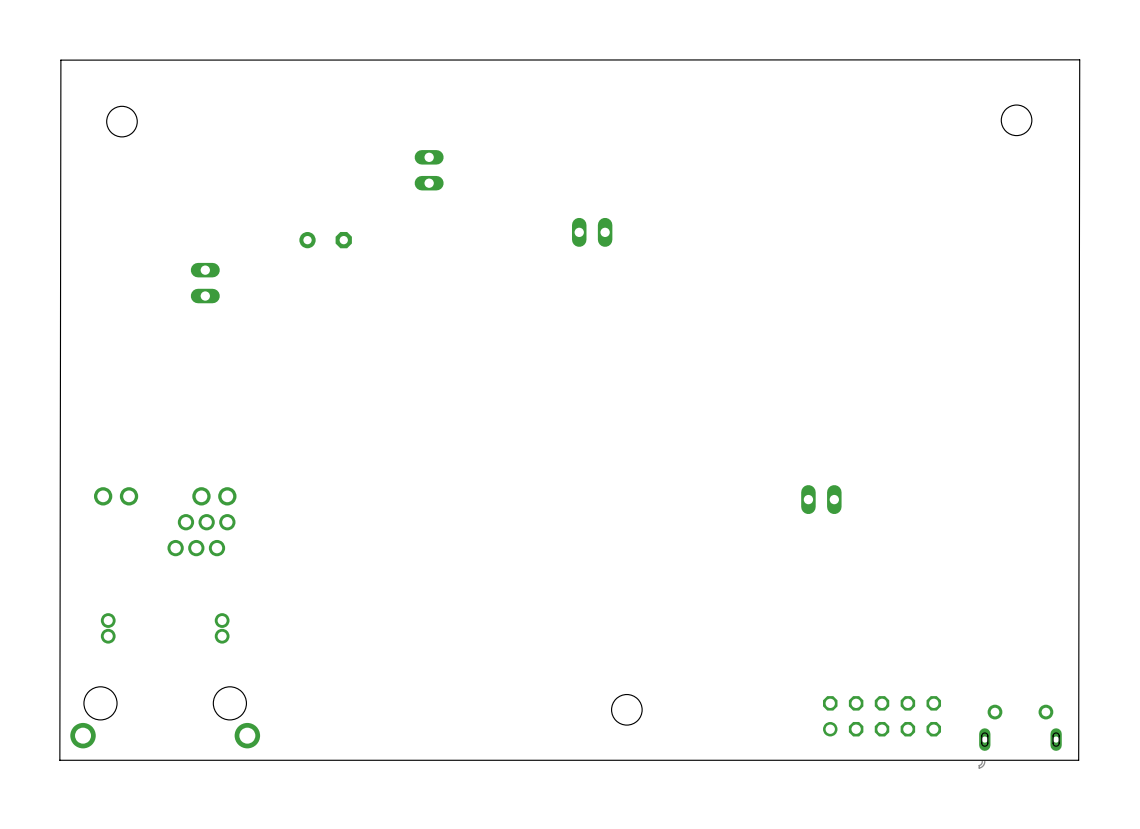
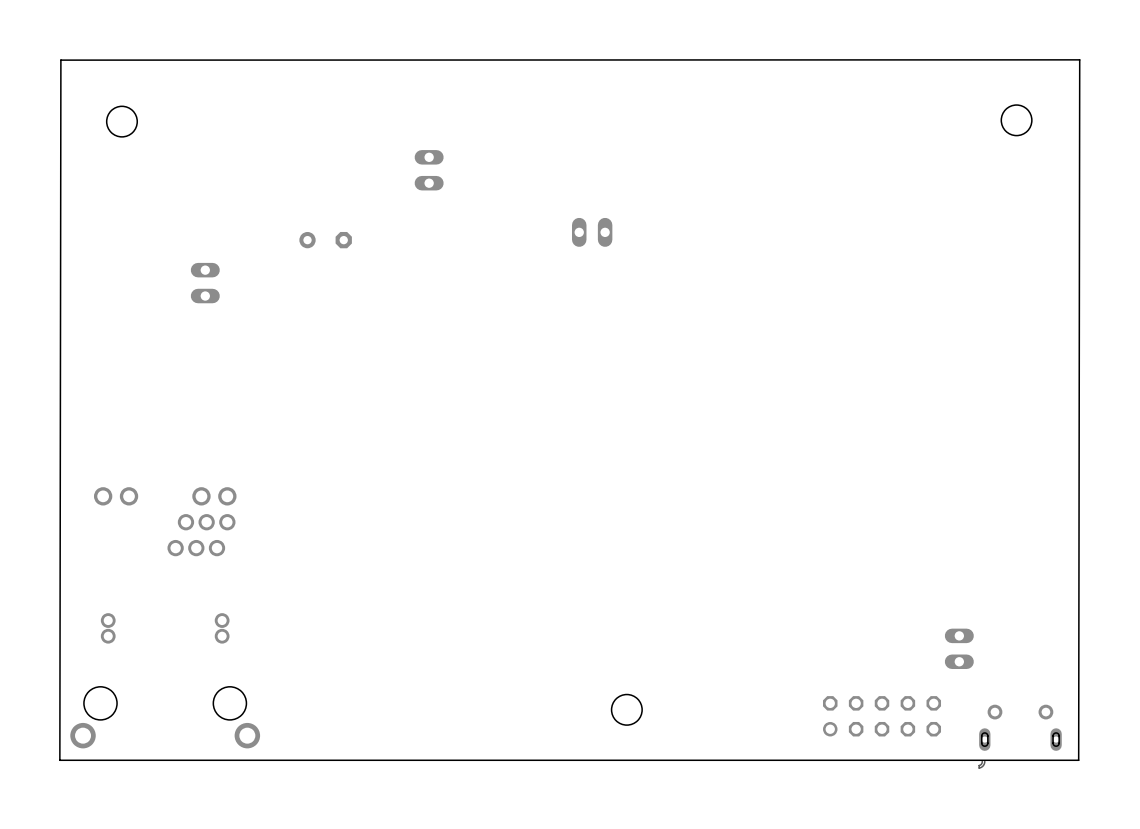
part rotation: 0° (821, 499) -> 90° clockwise (959, 648)
part position: (821, 499) -> (959, 648)

